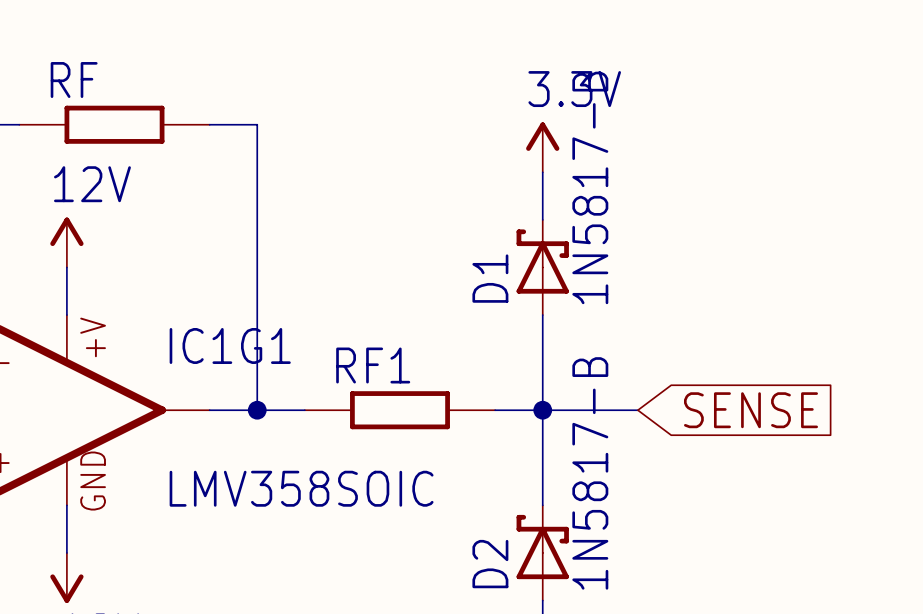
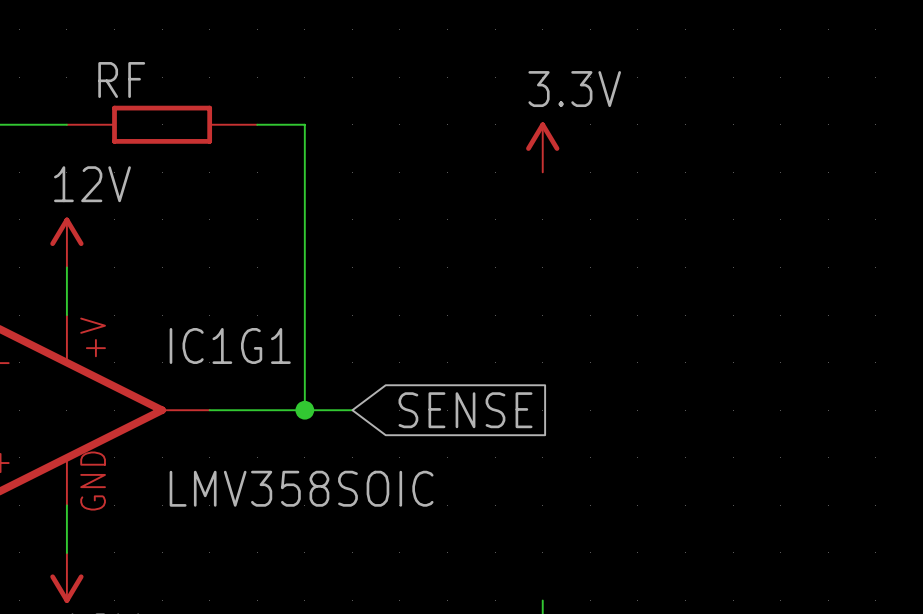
RF position: (114, 124) -> (162, 124)
wire: (209, 124) (257, 124) (257, 410) -> none
wire: none -> (257, 124) (304, 124) (304, 410) (352, 410)
wire: (542, 172) (542, 219) -> none
D1: 1N5817-B (542, 267) -> none
wire: (542, 315) (542, 505) -> none
junction position: (257, 410) -> (304, 410)
RF1: (399, 410) -> none
wire: (495, 410) (637, 410) -> none
junction: (542, 410) -> none
global label position: SENSE (750, 410) -> SENSE (465, 410)
D2: 1N5817-B (542, 552) -> none

